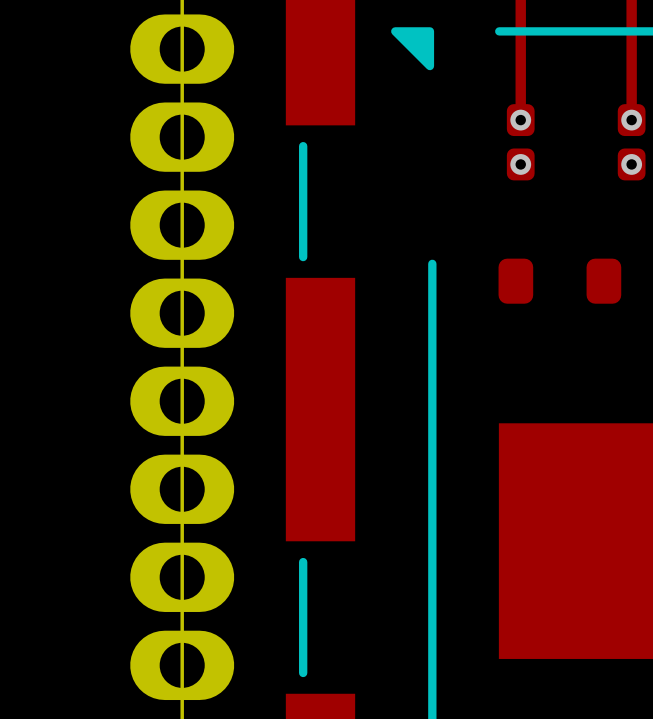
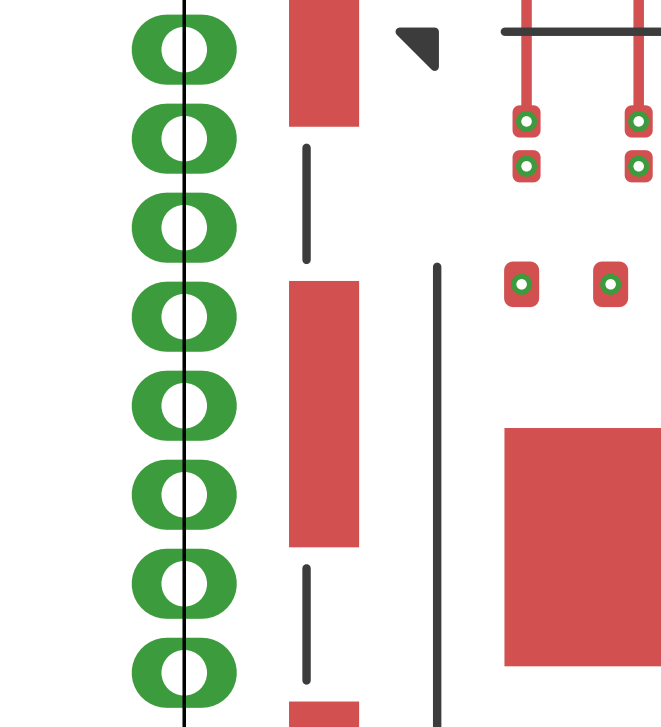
via: none -> (521, 284)
via: none -> (610, 284)

